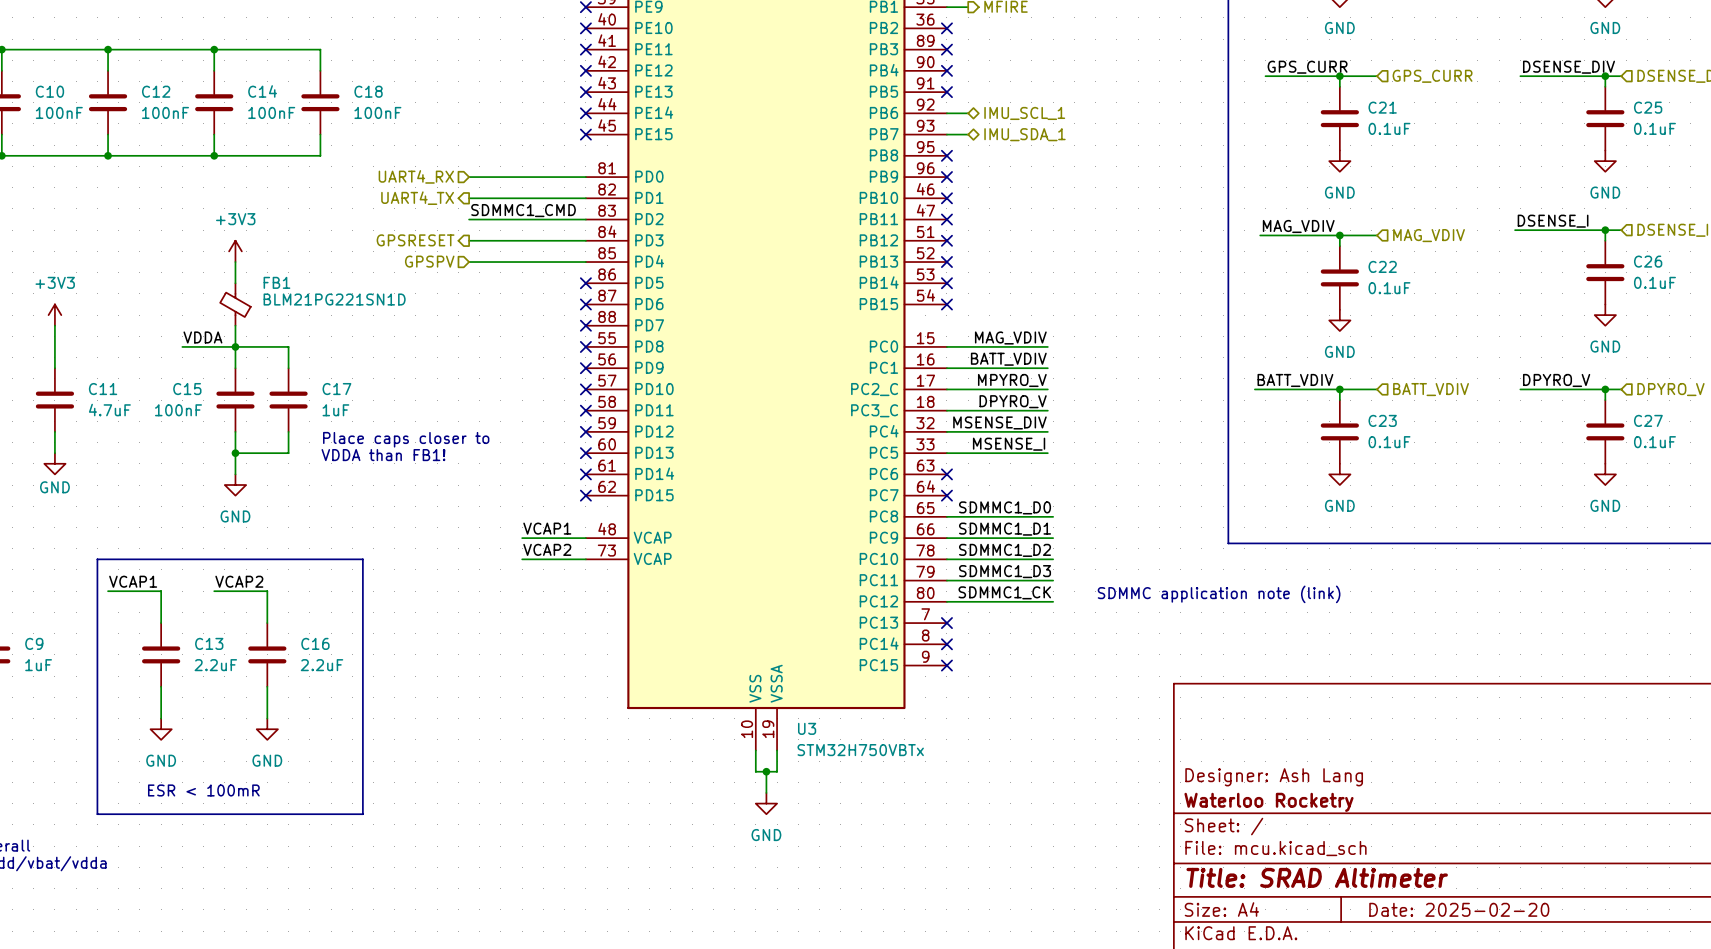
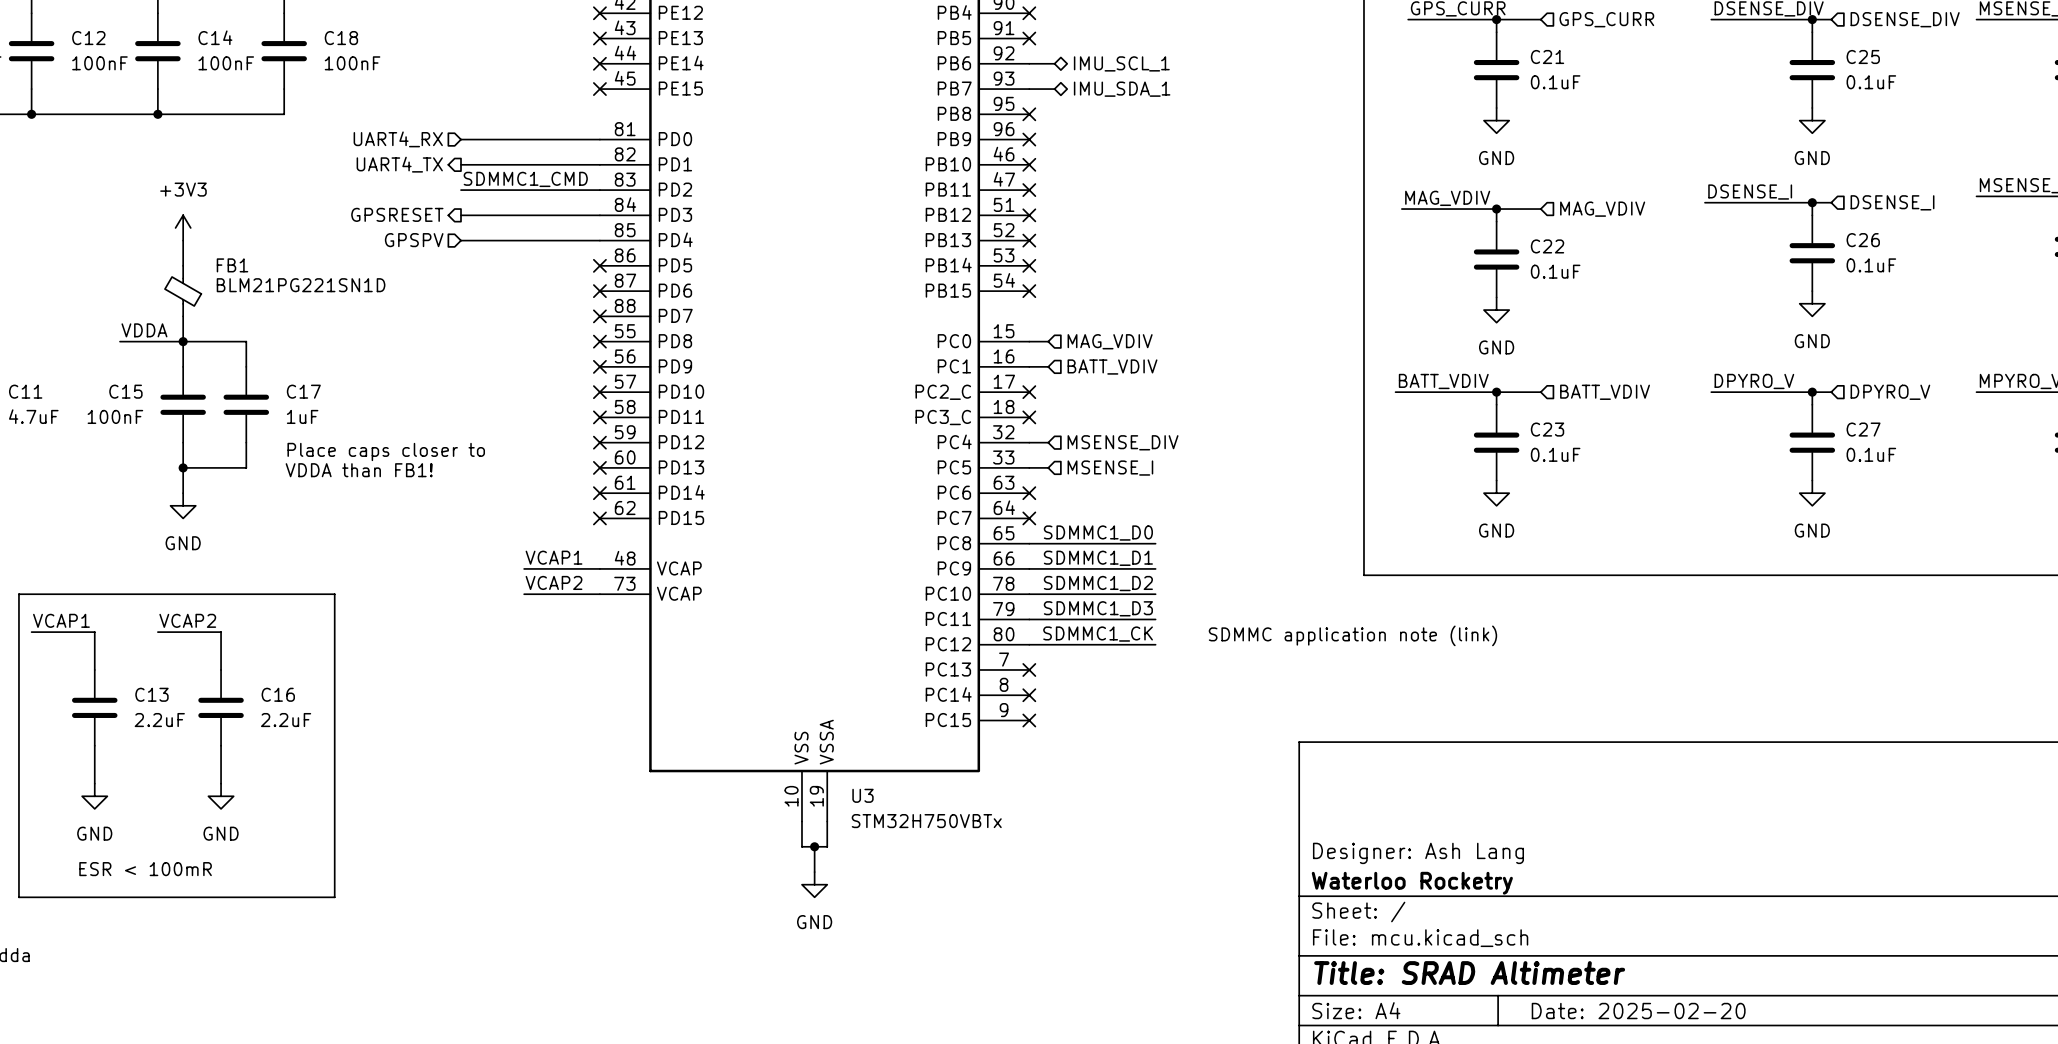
label: MAG_VDIV (1010, 337) -> none
wire: (962, 346) (1047, 346) -> none
hierarchical label: none -> MAG_VDIV (1110, 341)
label: BATT_VDIV (1008, 359) -> none
wire: (962, 368) (1047, 368) -> none
hierarchical label: none -> BATT_VDIV (1112, 367)
label: MPYRO_V (1012, 380) -> none
wire: (946, 389) (1047, 389) -> none
no-connect mark: none -> (1029, 392)
label: DPYRO_V (1013, 401) -> none
wire: (946, 410) (1047, 410) -> none
no-connect mark: none -> (1029, 417)
label: MSENSE_DIV (999, 422) -> none
wire: (962, 431) (1047, 431) -> none
hierarchical label: none -> MSENSE_DIV (1123, 442)
label: MSENSE_I (1009, 444) -> none
wire: (962, 453) (1047, 453) -> none
hierarchical label: none -> MSENSE_I (1110, 468)

